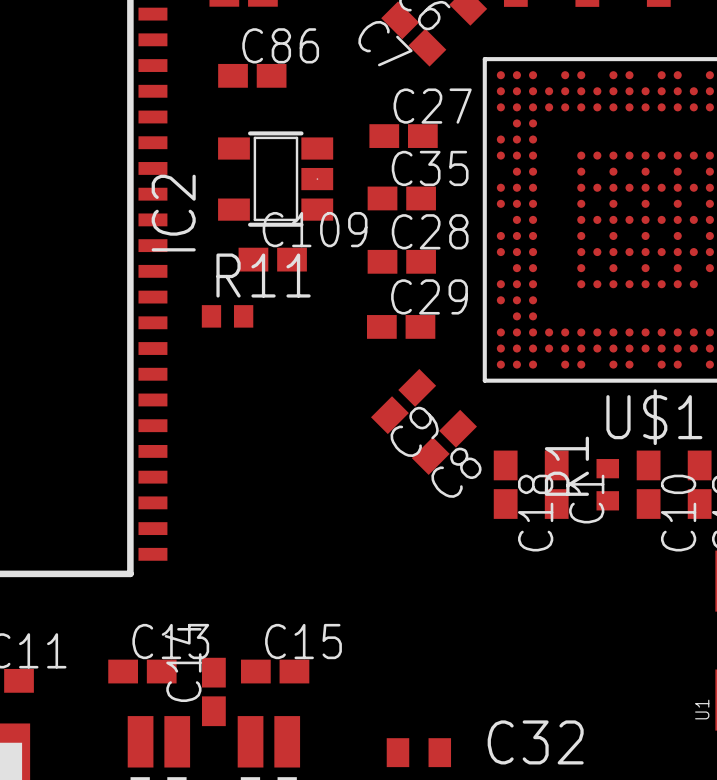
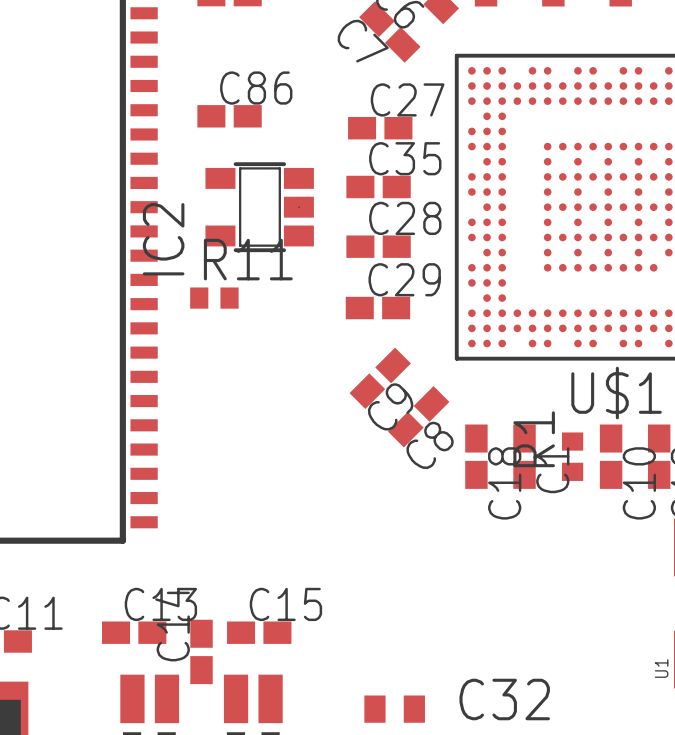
C86 position: (252, 75) -> (229, 116)
IC2 position: (275, 179) -> (259, 207)
C109: (272, 259) -> none

